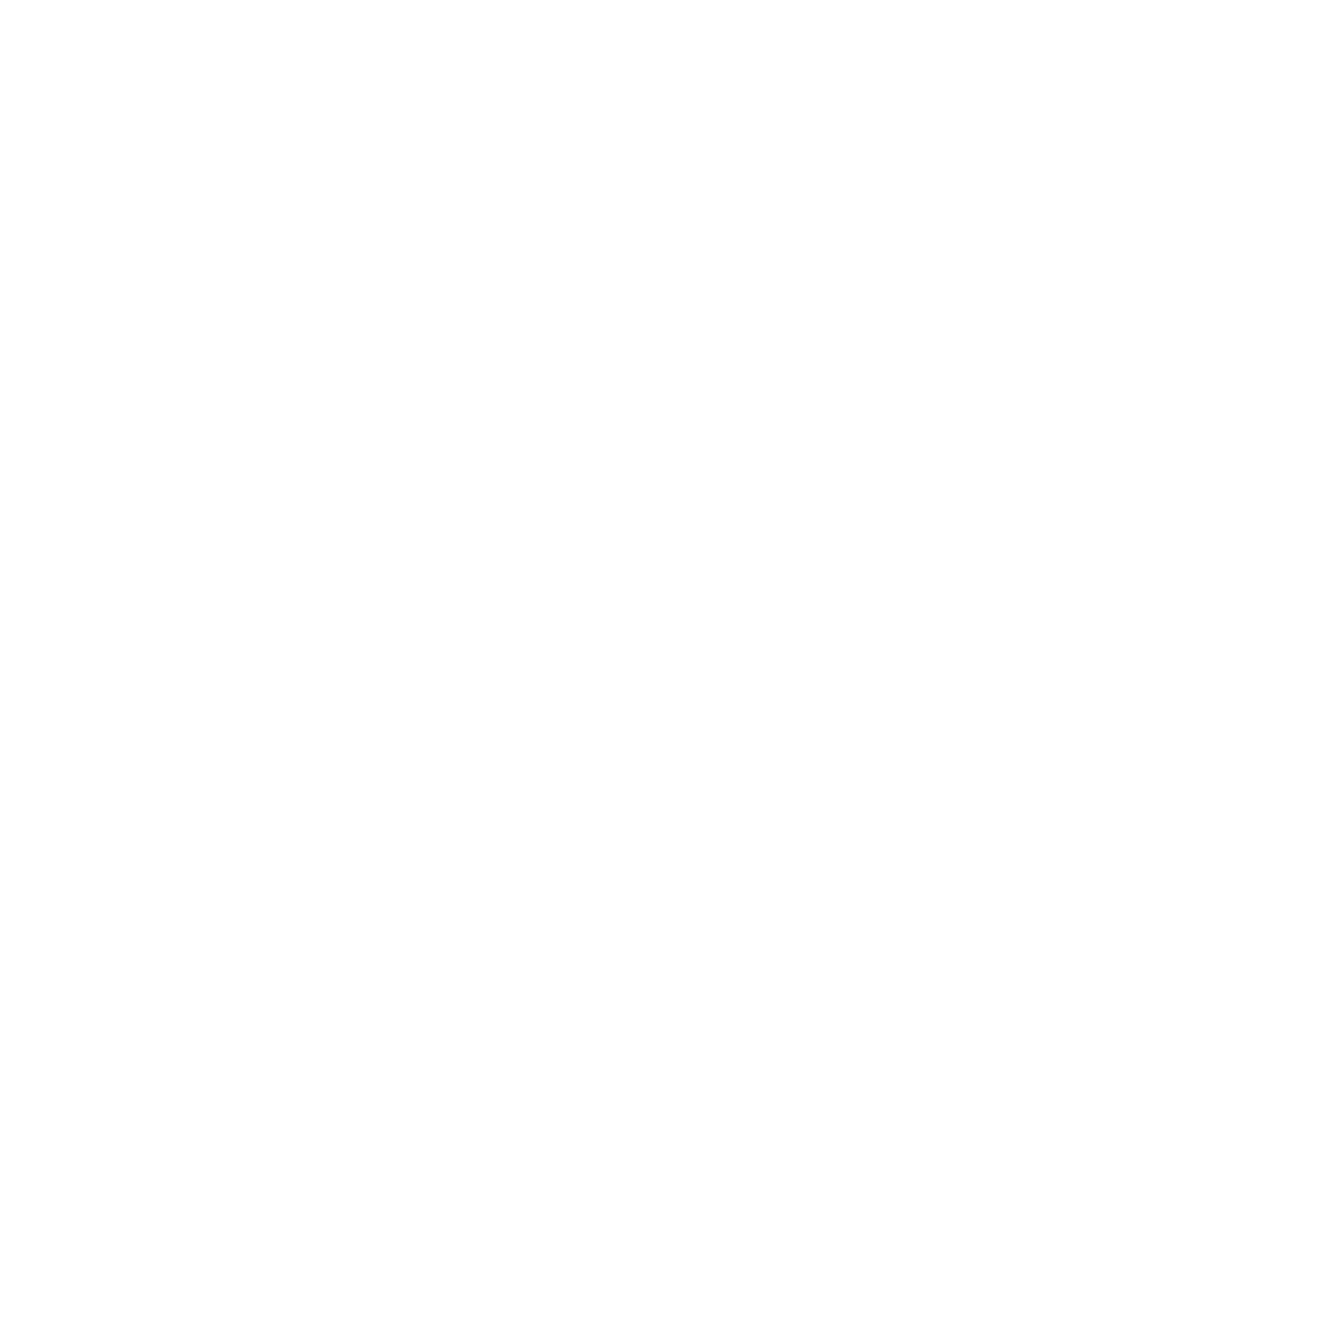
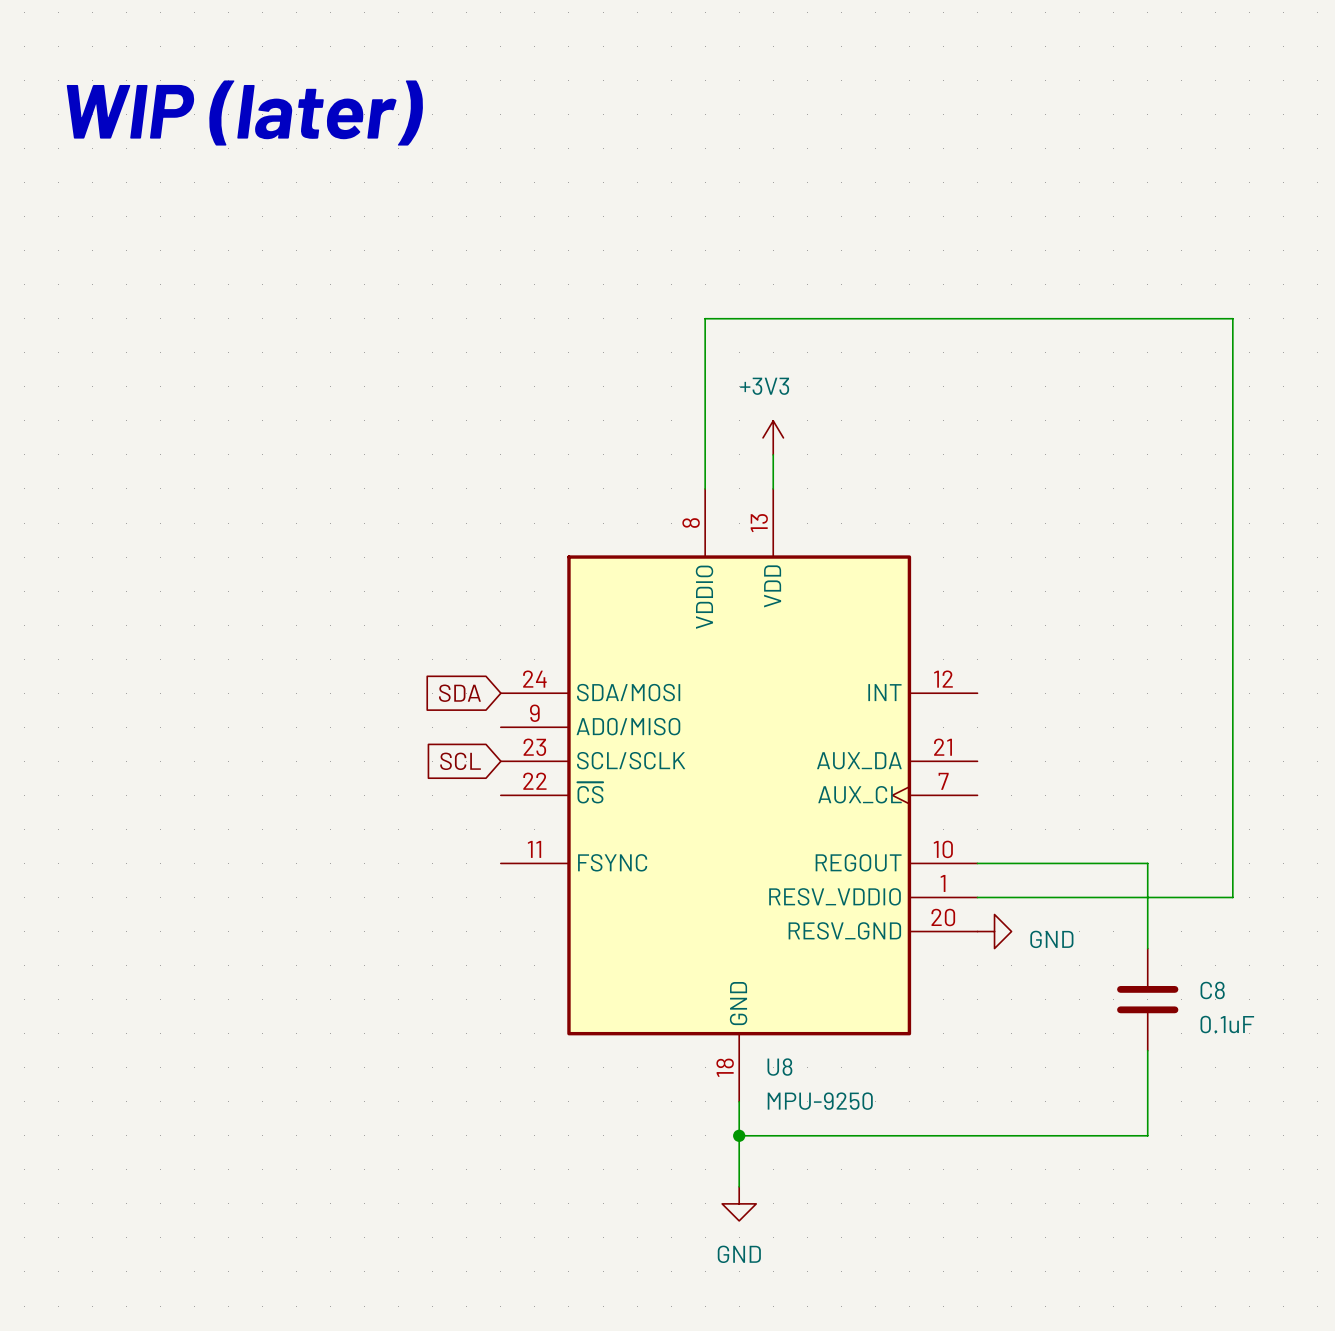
text: none -> WIP (later) (245, 113)
power symbol: none -> +3V3 (773, 437)
wire: none -> (773, 454) (773, 488)
wire: none -> (705, 488) (705, 318) (1232, 318) (1232, 897) (977, 897)
global label: none -> SDA (459, 693)
global label: none -> SCL (460, 761)
U8: none -> MPU-9250 (739, 795)
wire: none -> (977, 863) (1147, 863) (1147, 948)
power symbol: none -> GND (994, 931)
C8: none -> 0.1uF (1147, 999)
wire: none -> (1147, 1050) (1147, 1135) (739, 1135)
wire: none -> (739, 1101) (739, 1186)
junction: none -> (739, 1135)
power symbol: none -> GND (739, 1203)

